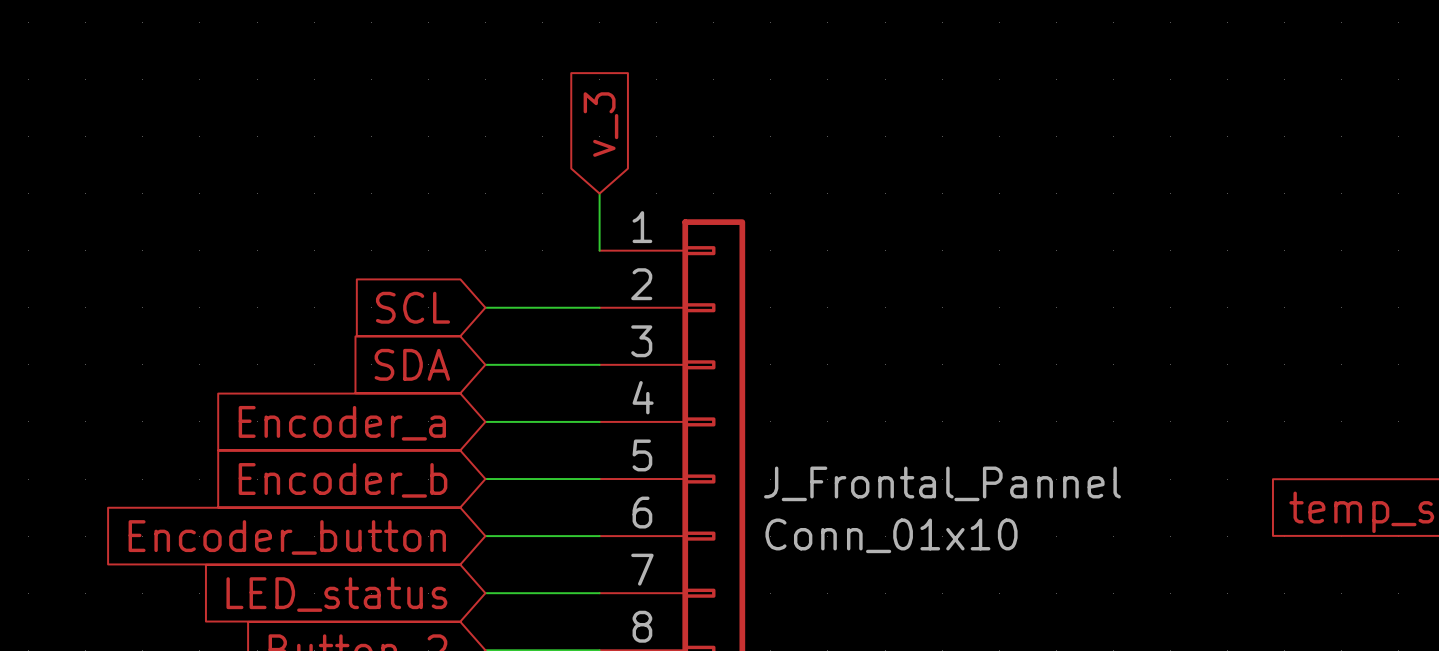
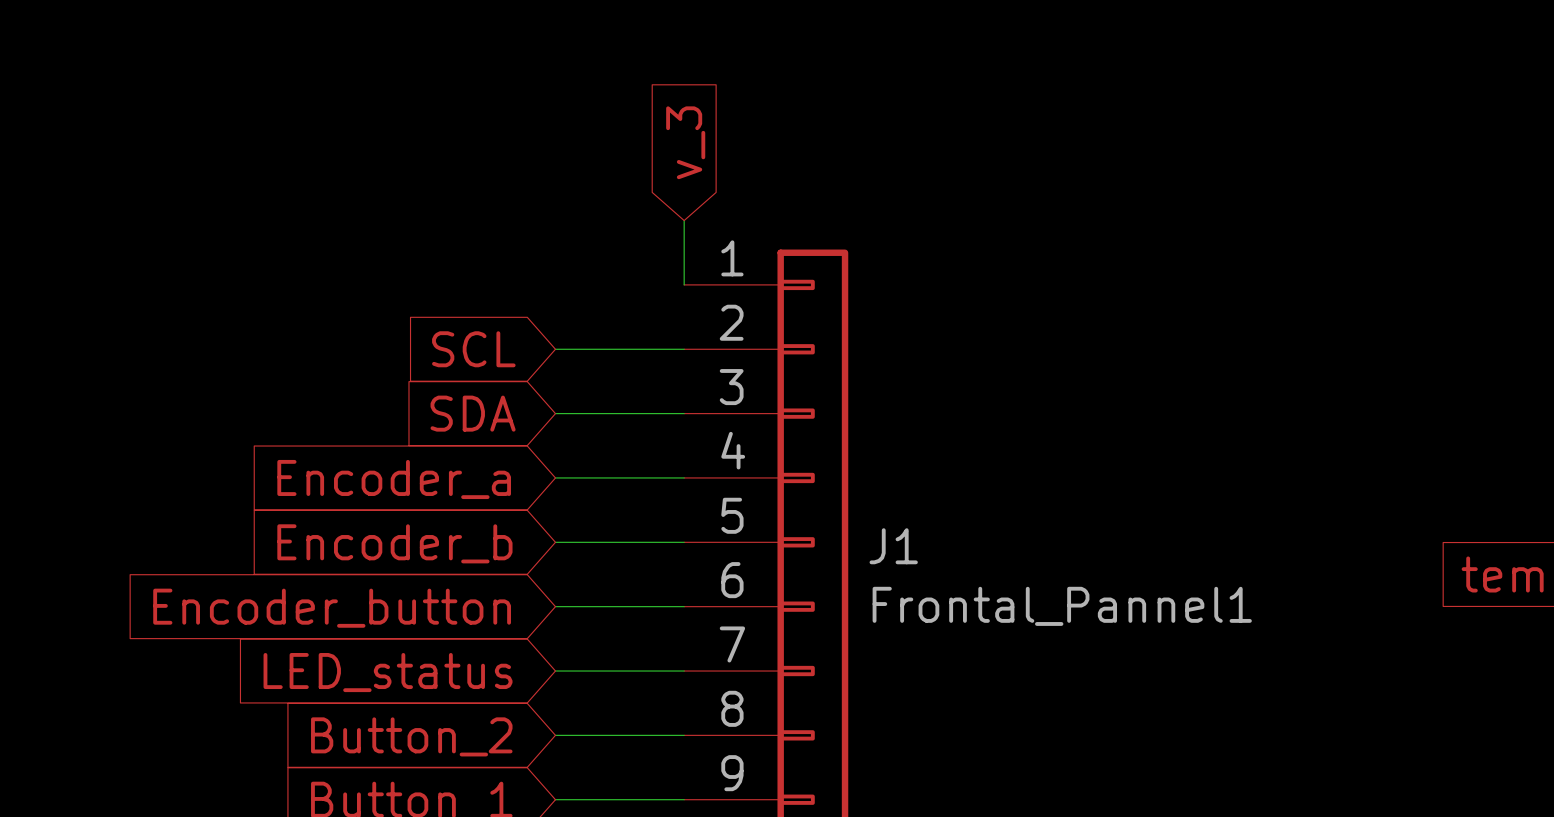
J_Frontal_Pannel name: J_Frontal_Pannel (942, 483) -> J1 (893, 546)
J_Frontal_Pannel value: Conn_01x10 (891, 535) -> Frontal_Pannel1 (1062, 606)

